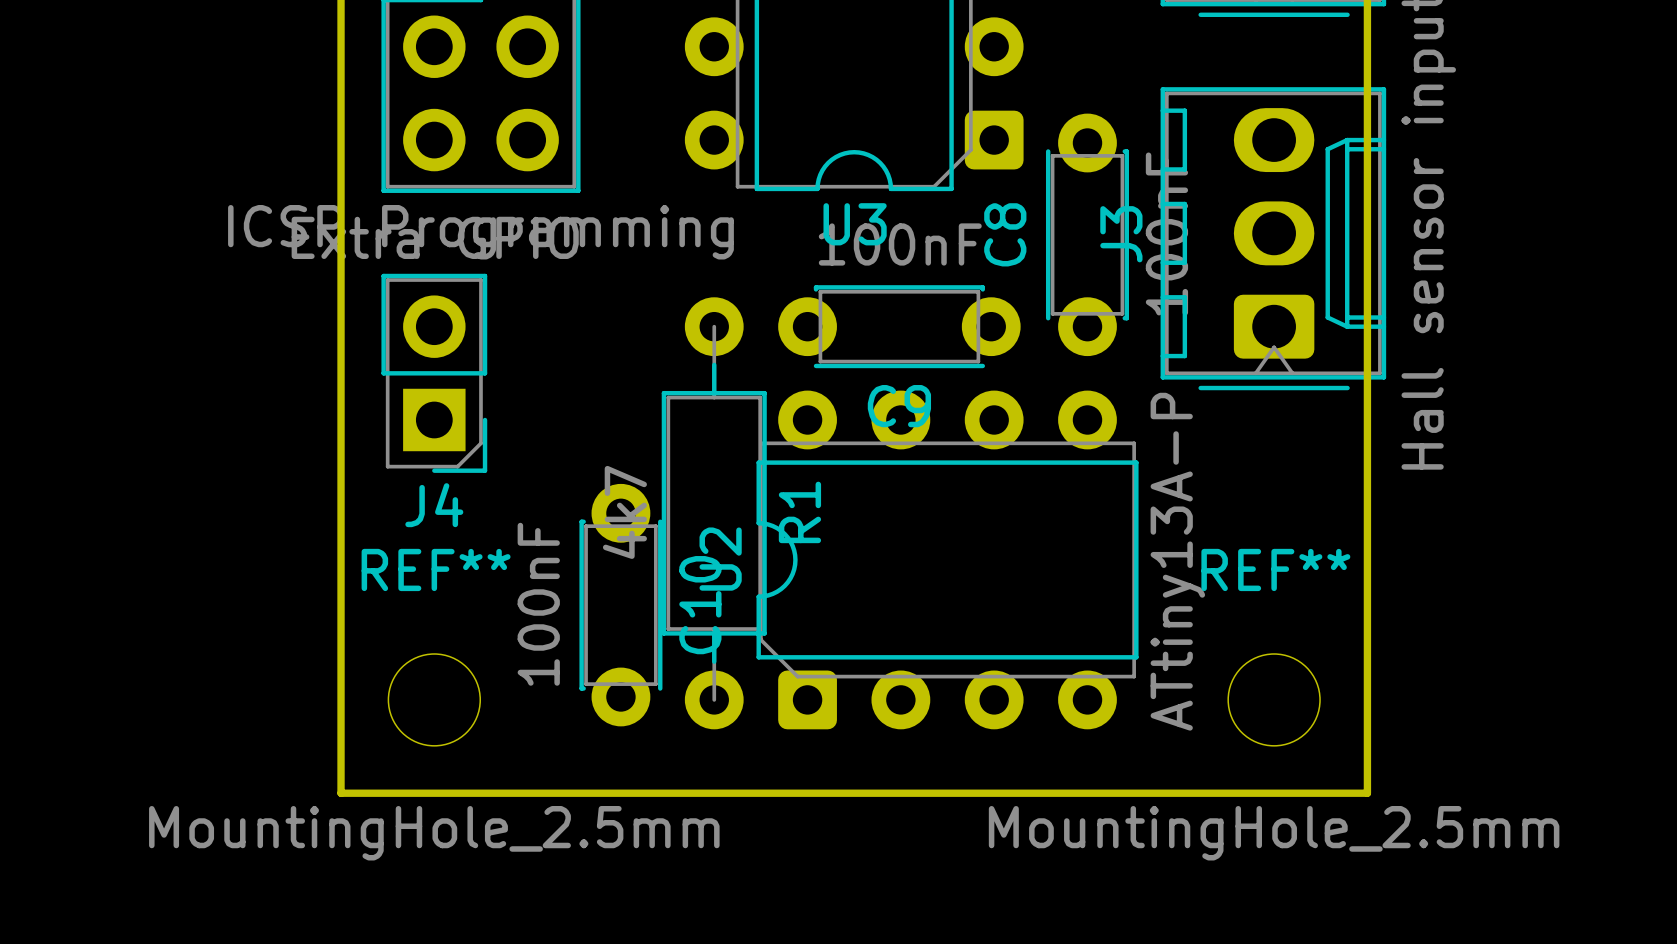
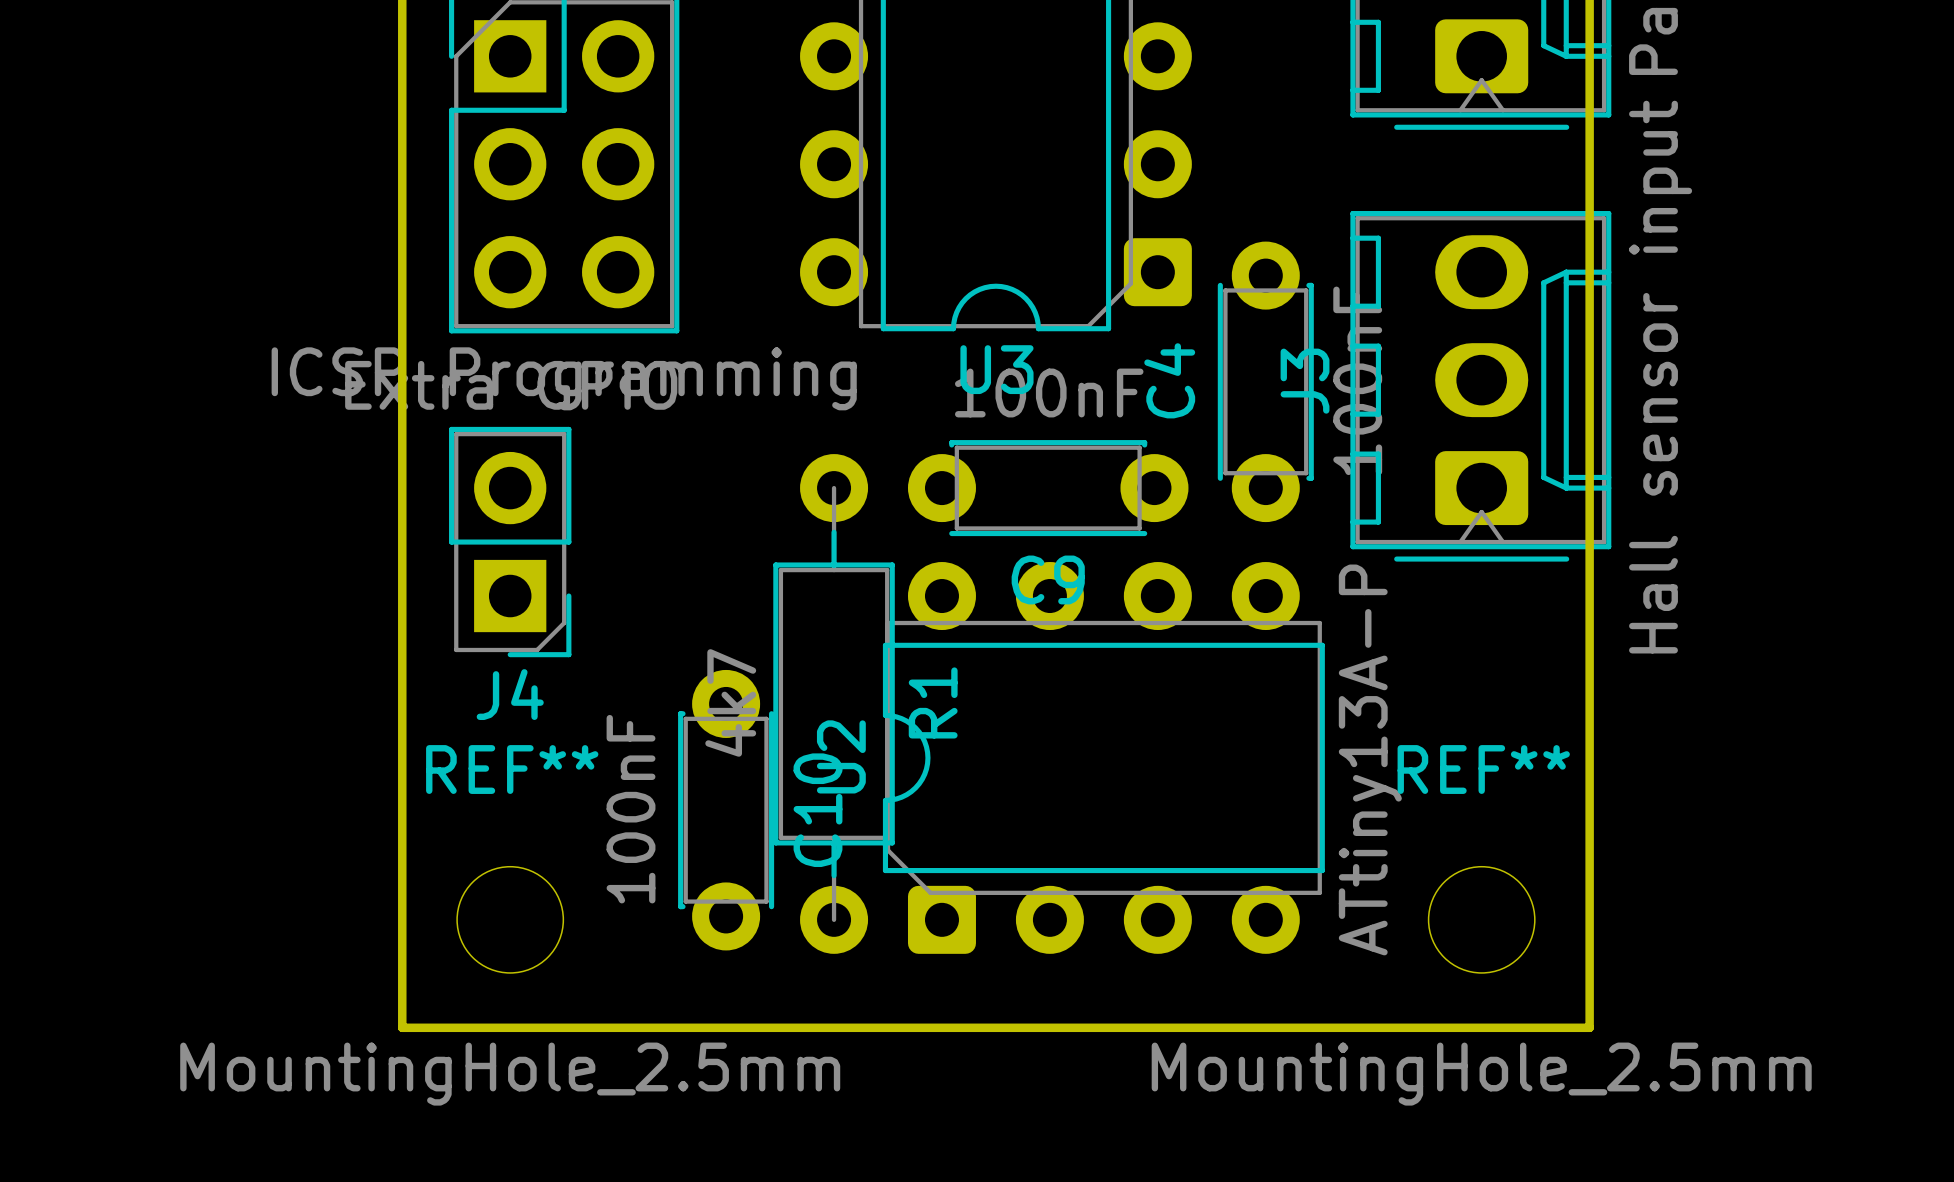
C8 name: C8 (1005, 234) -> C4 (1169, 380)

